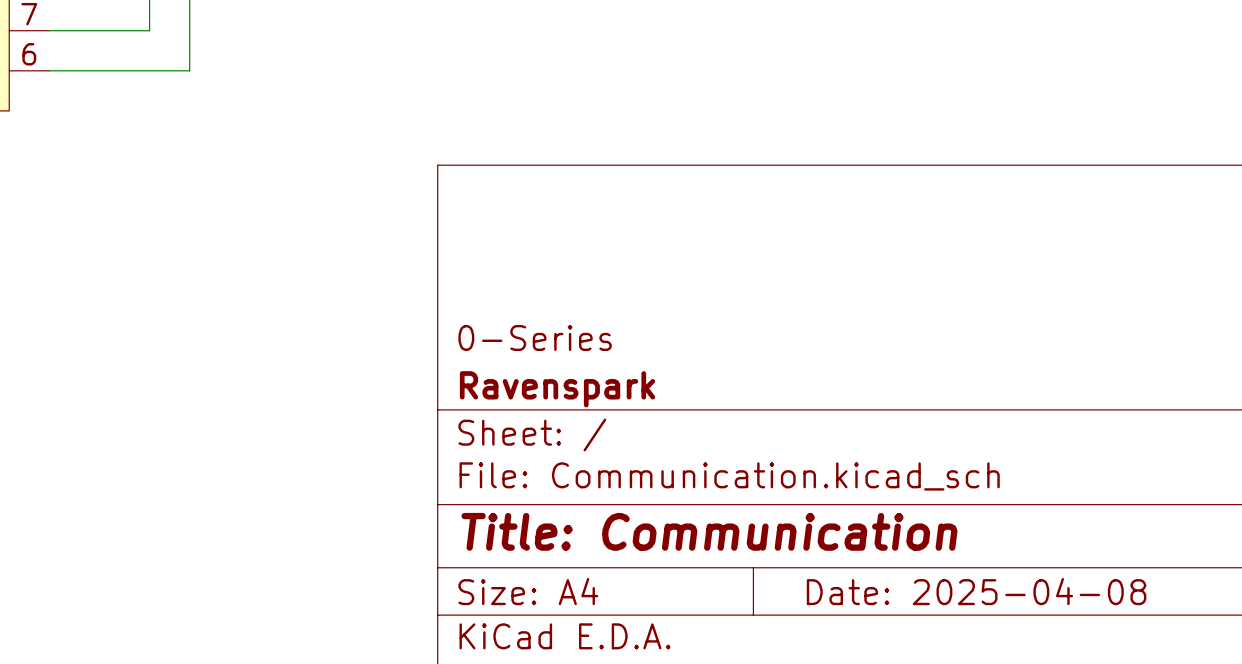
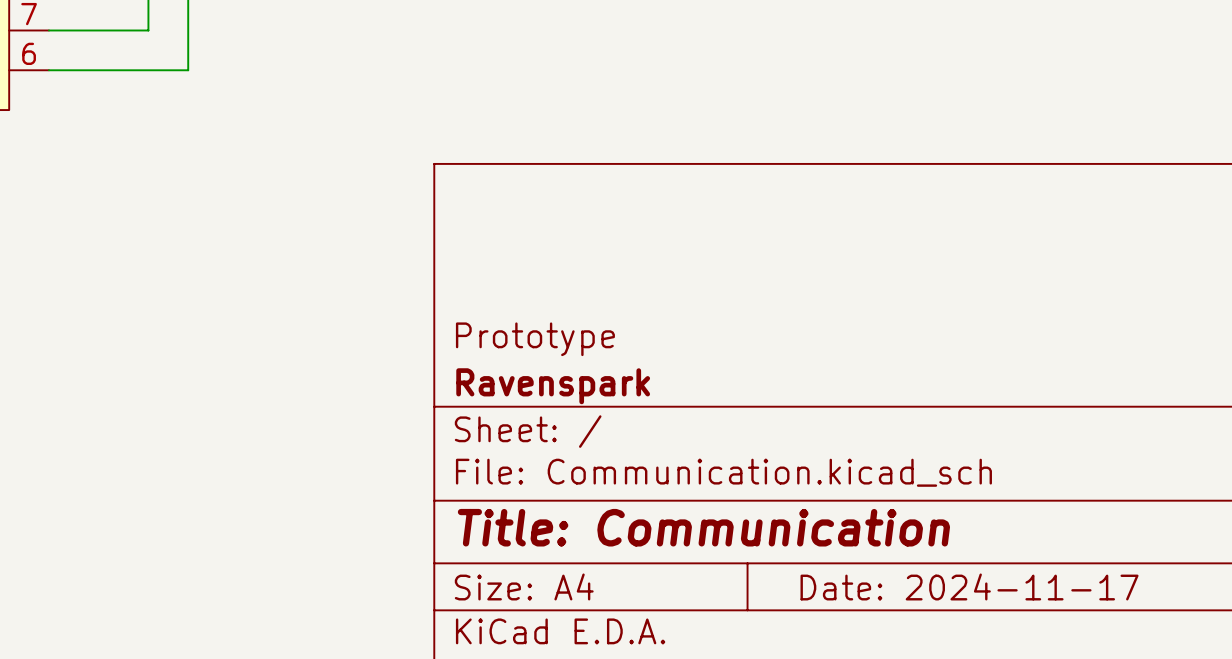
title block: 0-Series (535, 337) -> Prototype (535, 339)
title block: Date: 2025-04-08 (976, 591) -> Date: 2024-11-17 (969, 586)

